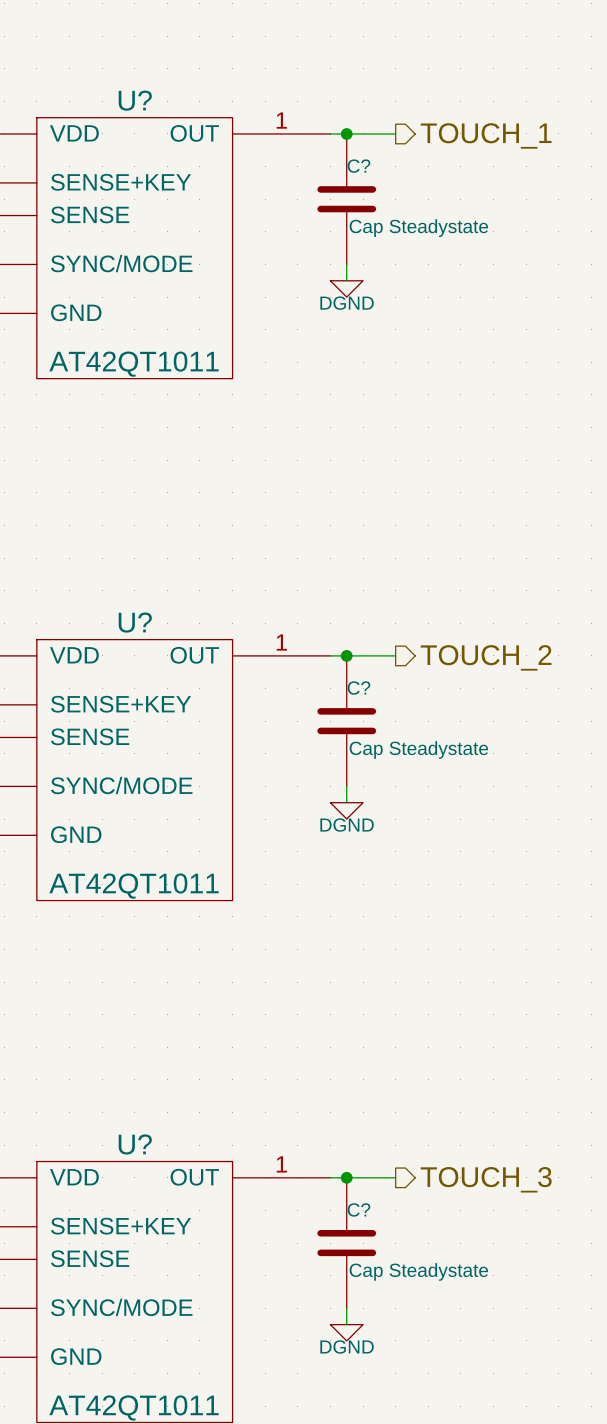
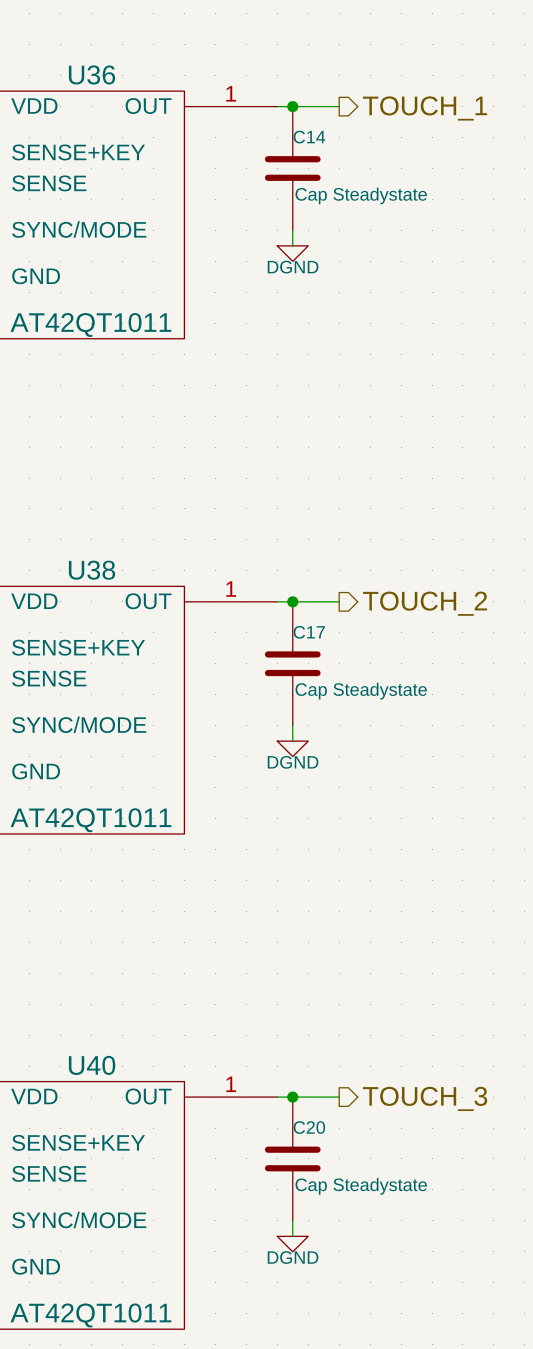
U? name: U? (135, 100) -> U36 (92, 74)
C? name: C? (358, 166) -> C14 (309, 137)
U? name: U? (135, 622) -> U38 (92, 570)
C? name: C? (358, 688) -> C17 (309, 632)
U? name: U? (135, 1144) -> U40 (92, 1065)
C? name: C? (358, 1209) -> C20 (309, 1127)

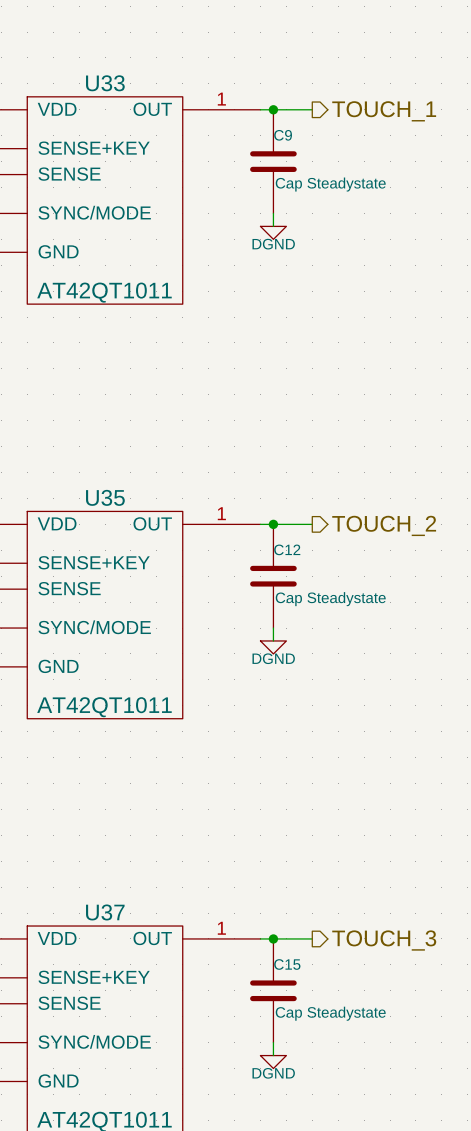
U36 name: U36 (92, 74) -> U33 (105, 83)
C14 name: C14 (309, 137) -> C9 (283, 135)
U38 name: U38 (92, 570) -> U35 (105, 497)
C17 name: C17 (309, 632) -> C12 (287, 549)
U40 name: U40 (92, 1065) -> U37 (105, 912)
C20 name: C20 (309, 1127) -> C15 (287, 964)

